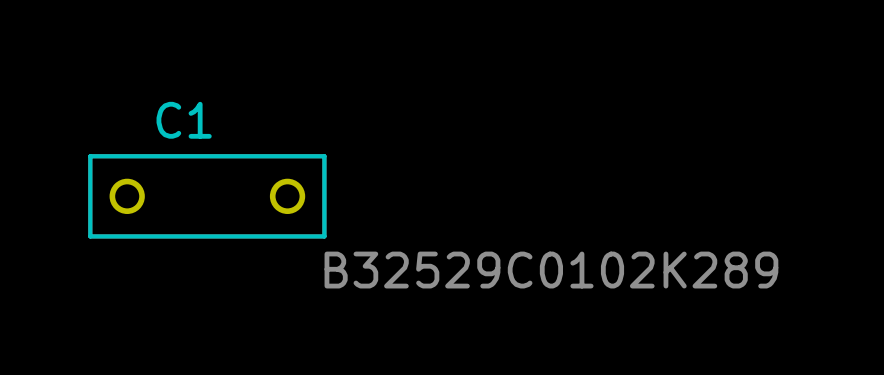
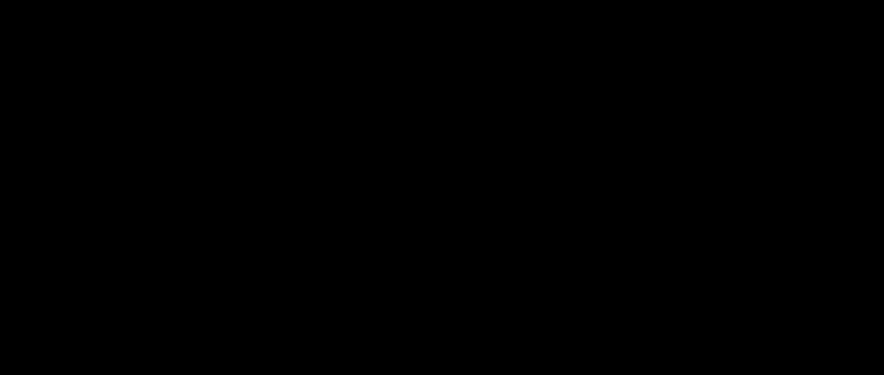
C1: B32529C0102K289 (207, 196) -> none

